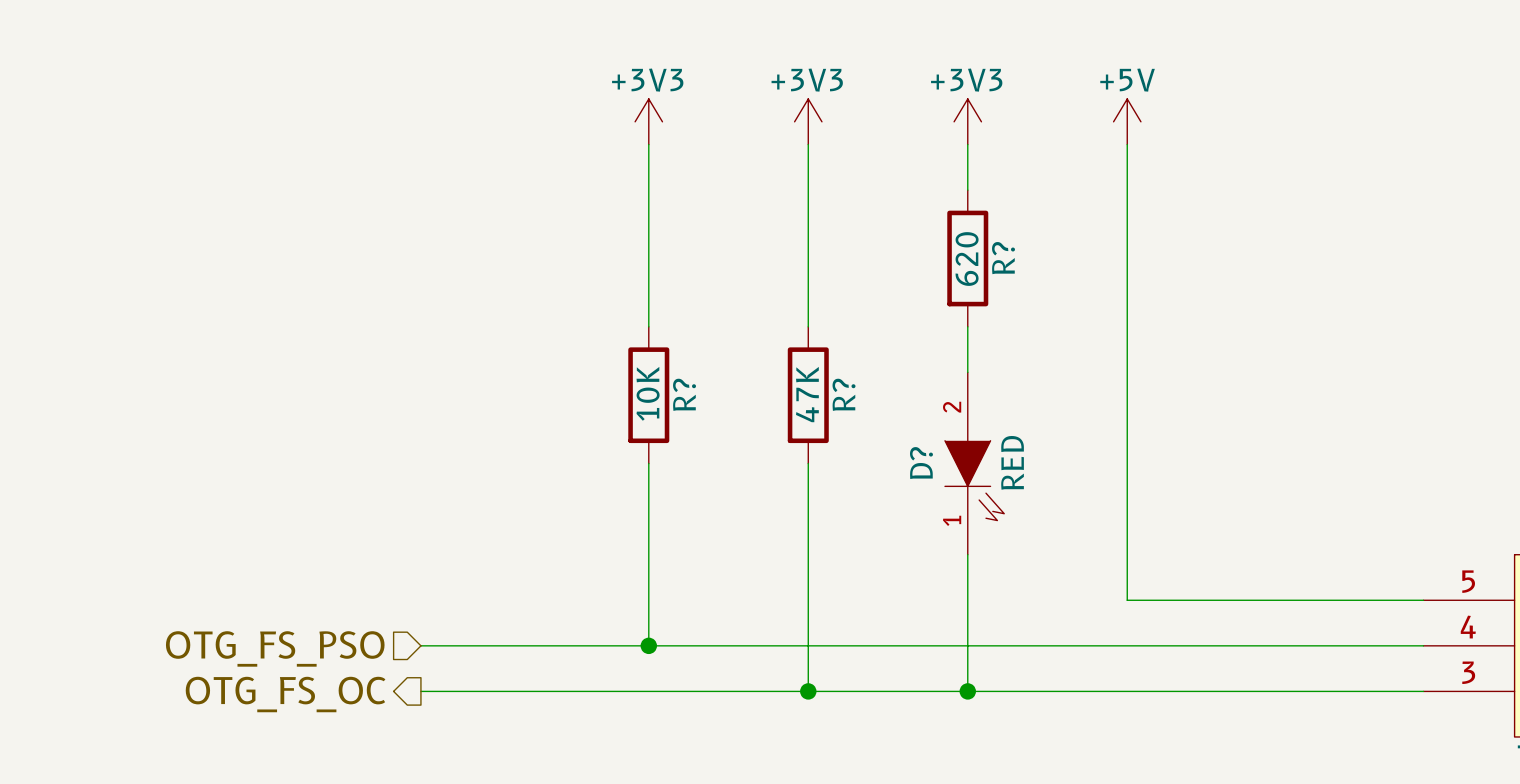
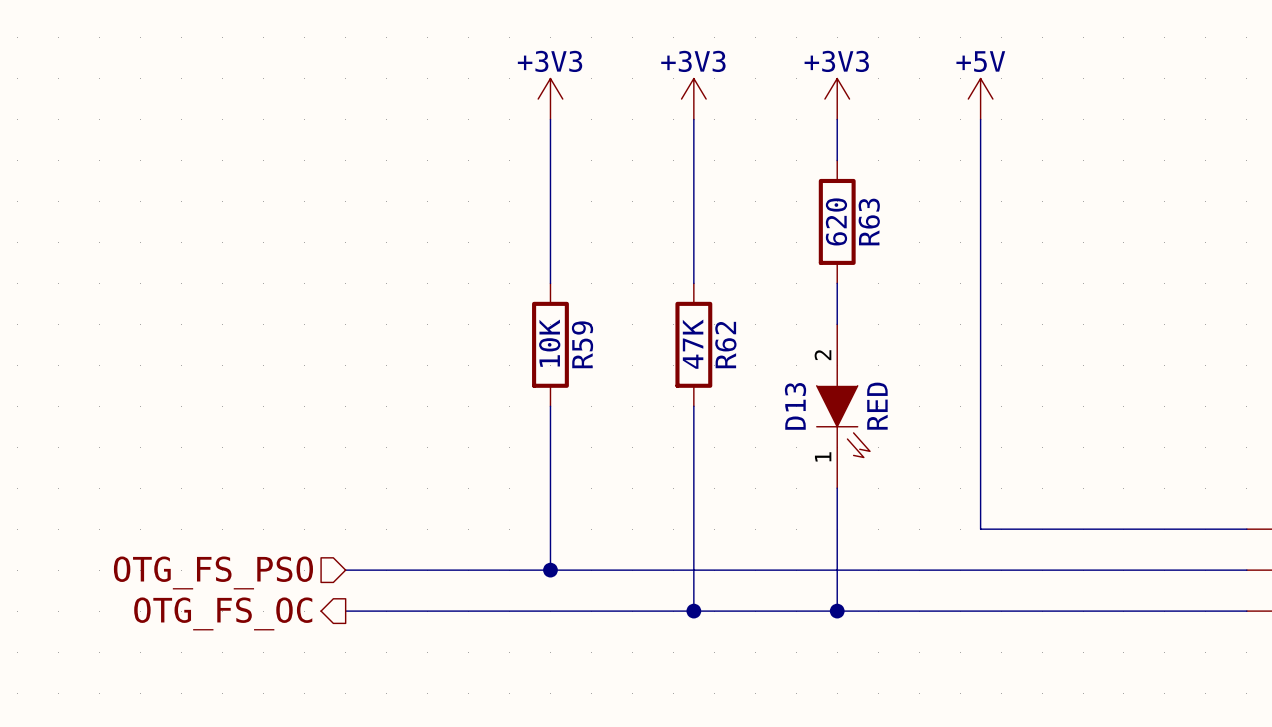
R? name: R? (1003, 258) -> R63 (869, 222)
R? name: R? (684, 394) -> R59 (582, 344)
R? name: R? (844, 394) -> R62 (725, 345)
D? name: D? (921, 463) -> D13 (795, 406)

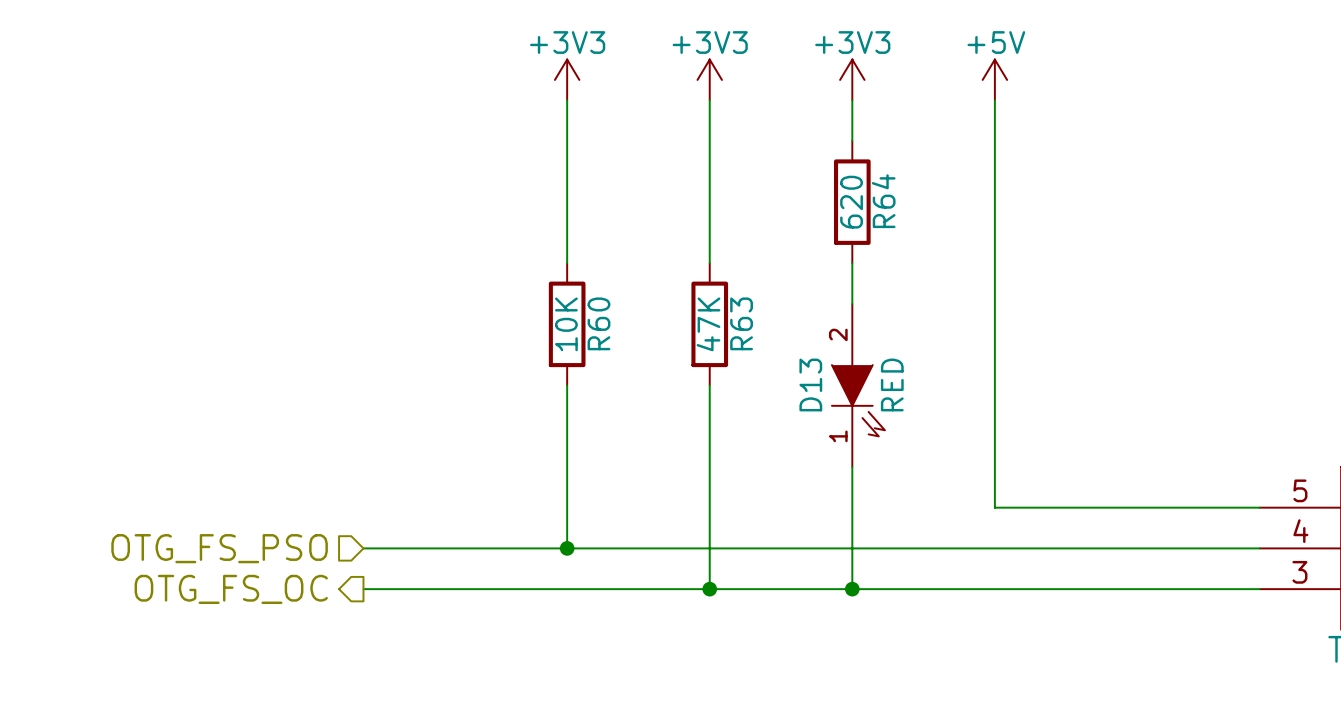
R63 name: R63 (869, 222) -> R64 (883, 201)
R59 name: R59 (582, 344) -> R60 (598, 323)
R62 name: R62 (725, 345) -> R63 (741, 323)

